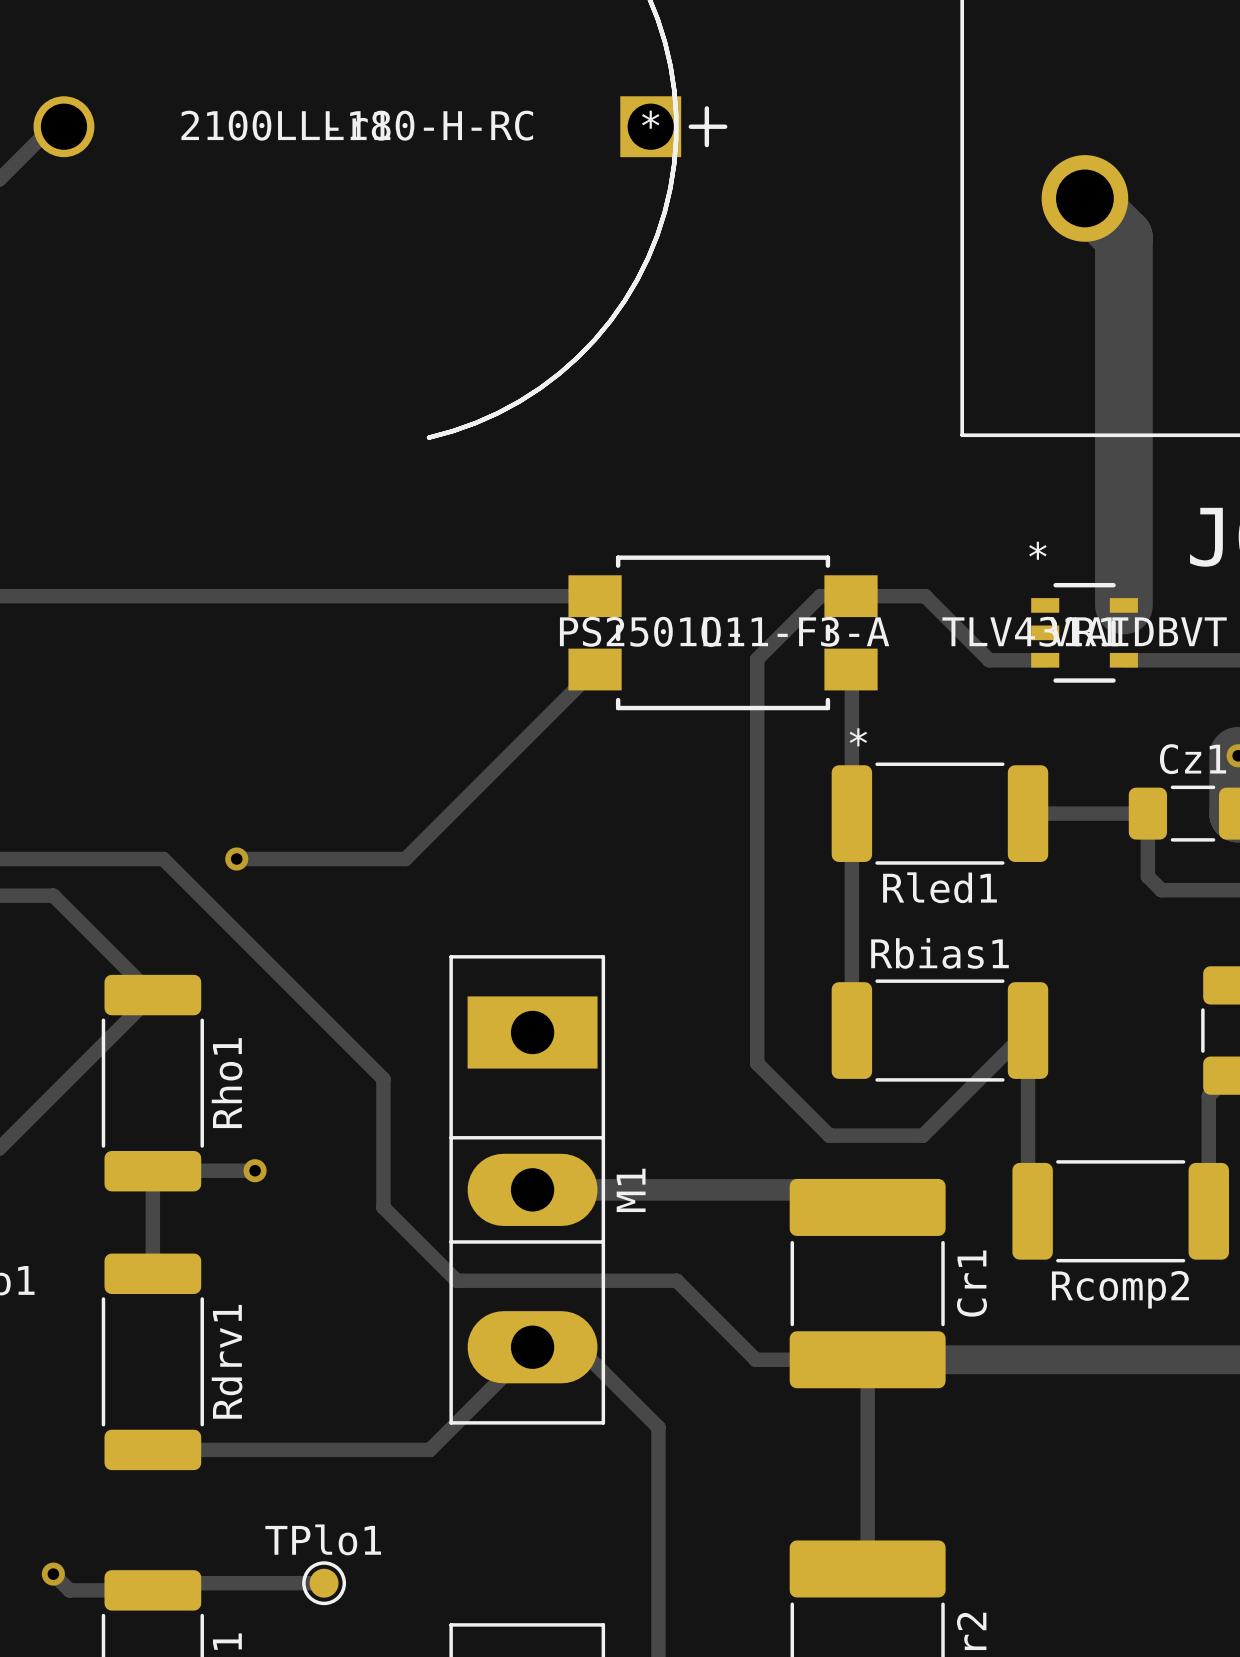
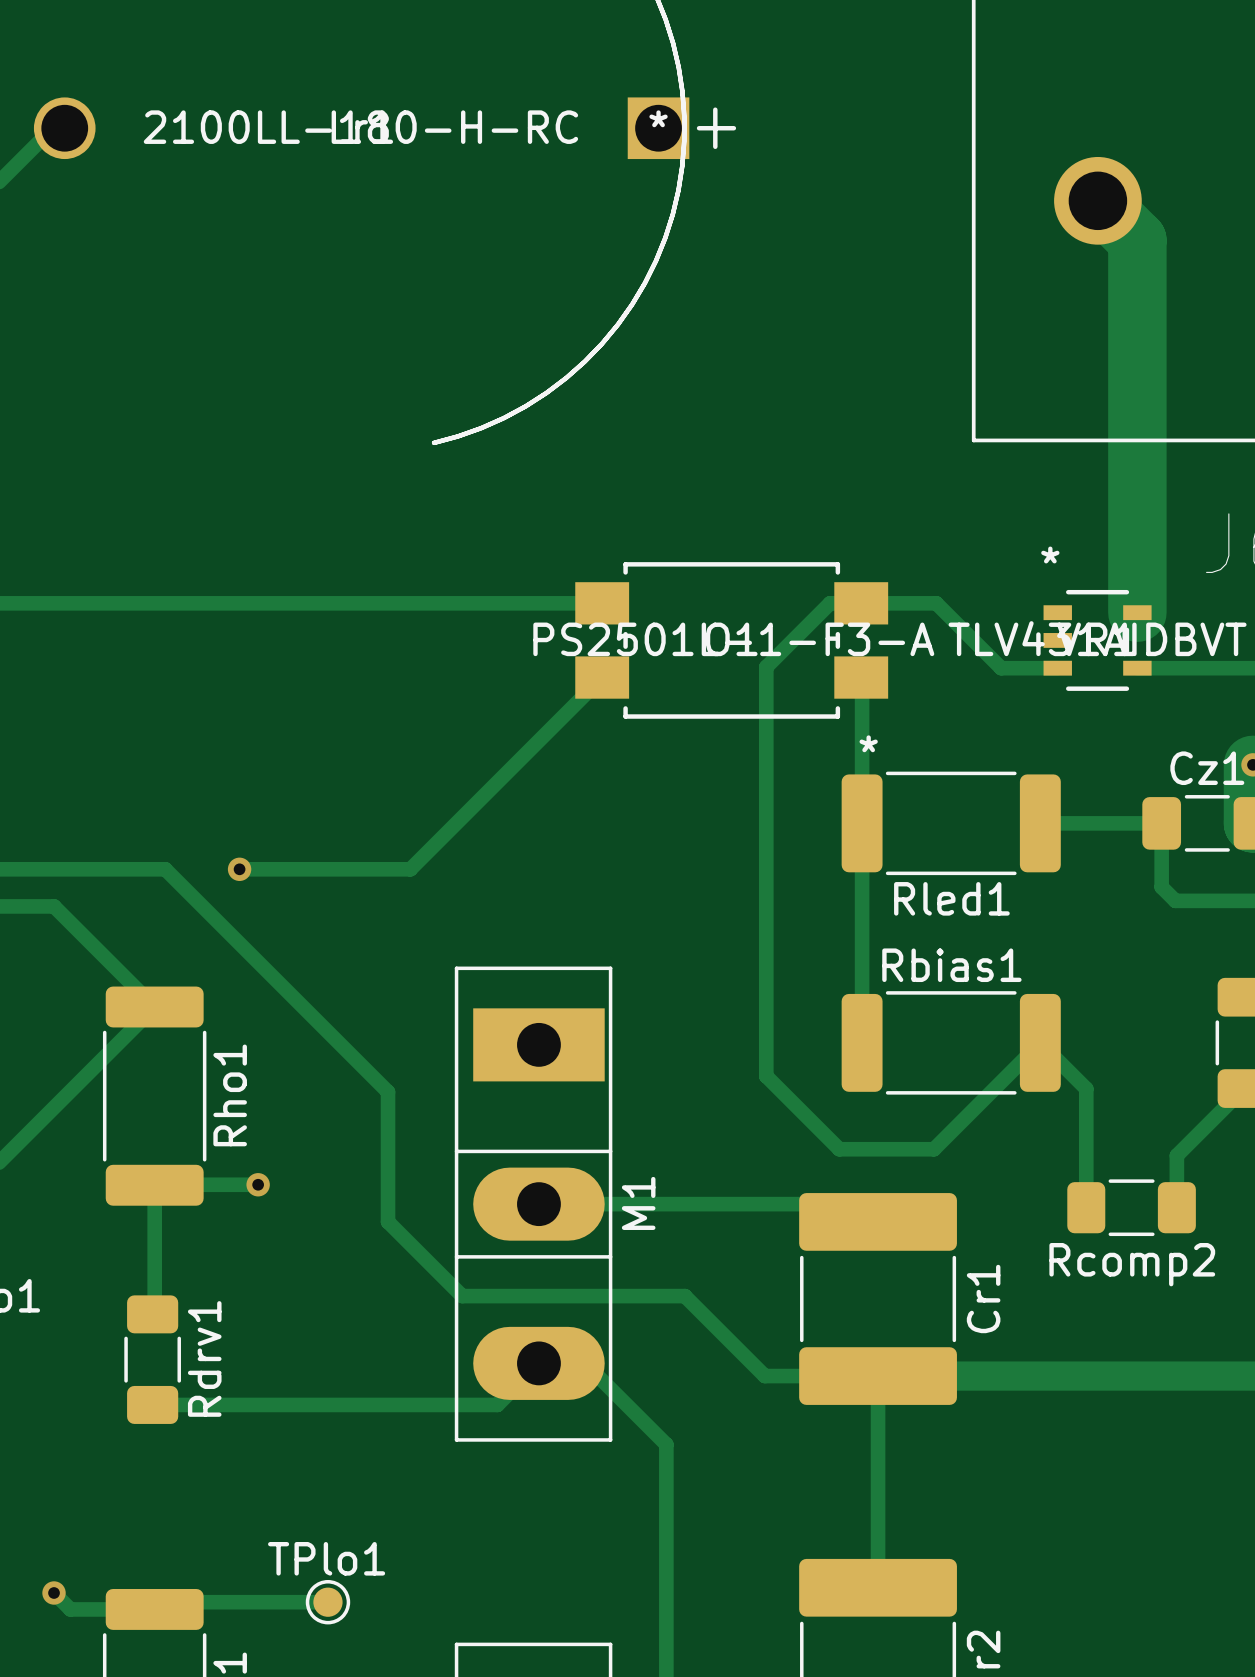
track: (1028, 1030) (1028, 1206) (1032, 1211) -> (1040, 1042) (1086, 1088) (1086, 1207)
track: (1208, 1096) (1208, 1211) -> (1223, 1109) (1176, 1155) (1176, 1207)
Rcomp2 footprint: [1012, 1160, 1230, 1263] -> [1067, 1179, 1196, 1237]
track width: thick (532, 1189) (850, 1189) (867, 1207) -> thin (538, 1204) (860, 1204) (878, 1221)
Rdrv1 footprint: [101, 1253, 204, 1471] -> [124, 1295, 181, 1424]
track: (491, 1388) (429, 1449) (152, 1449) -> (497, 1404) (152, 1404)

